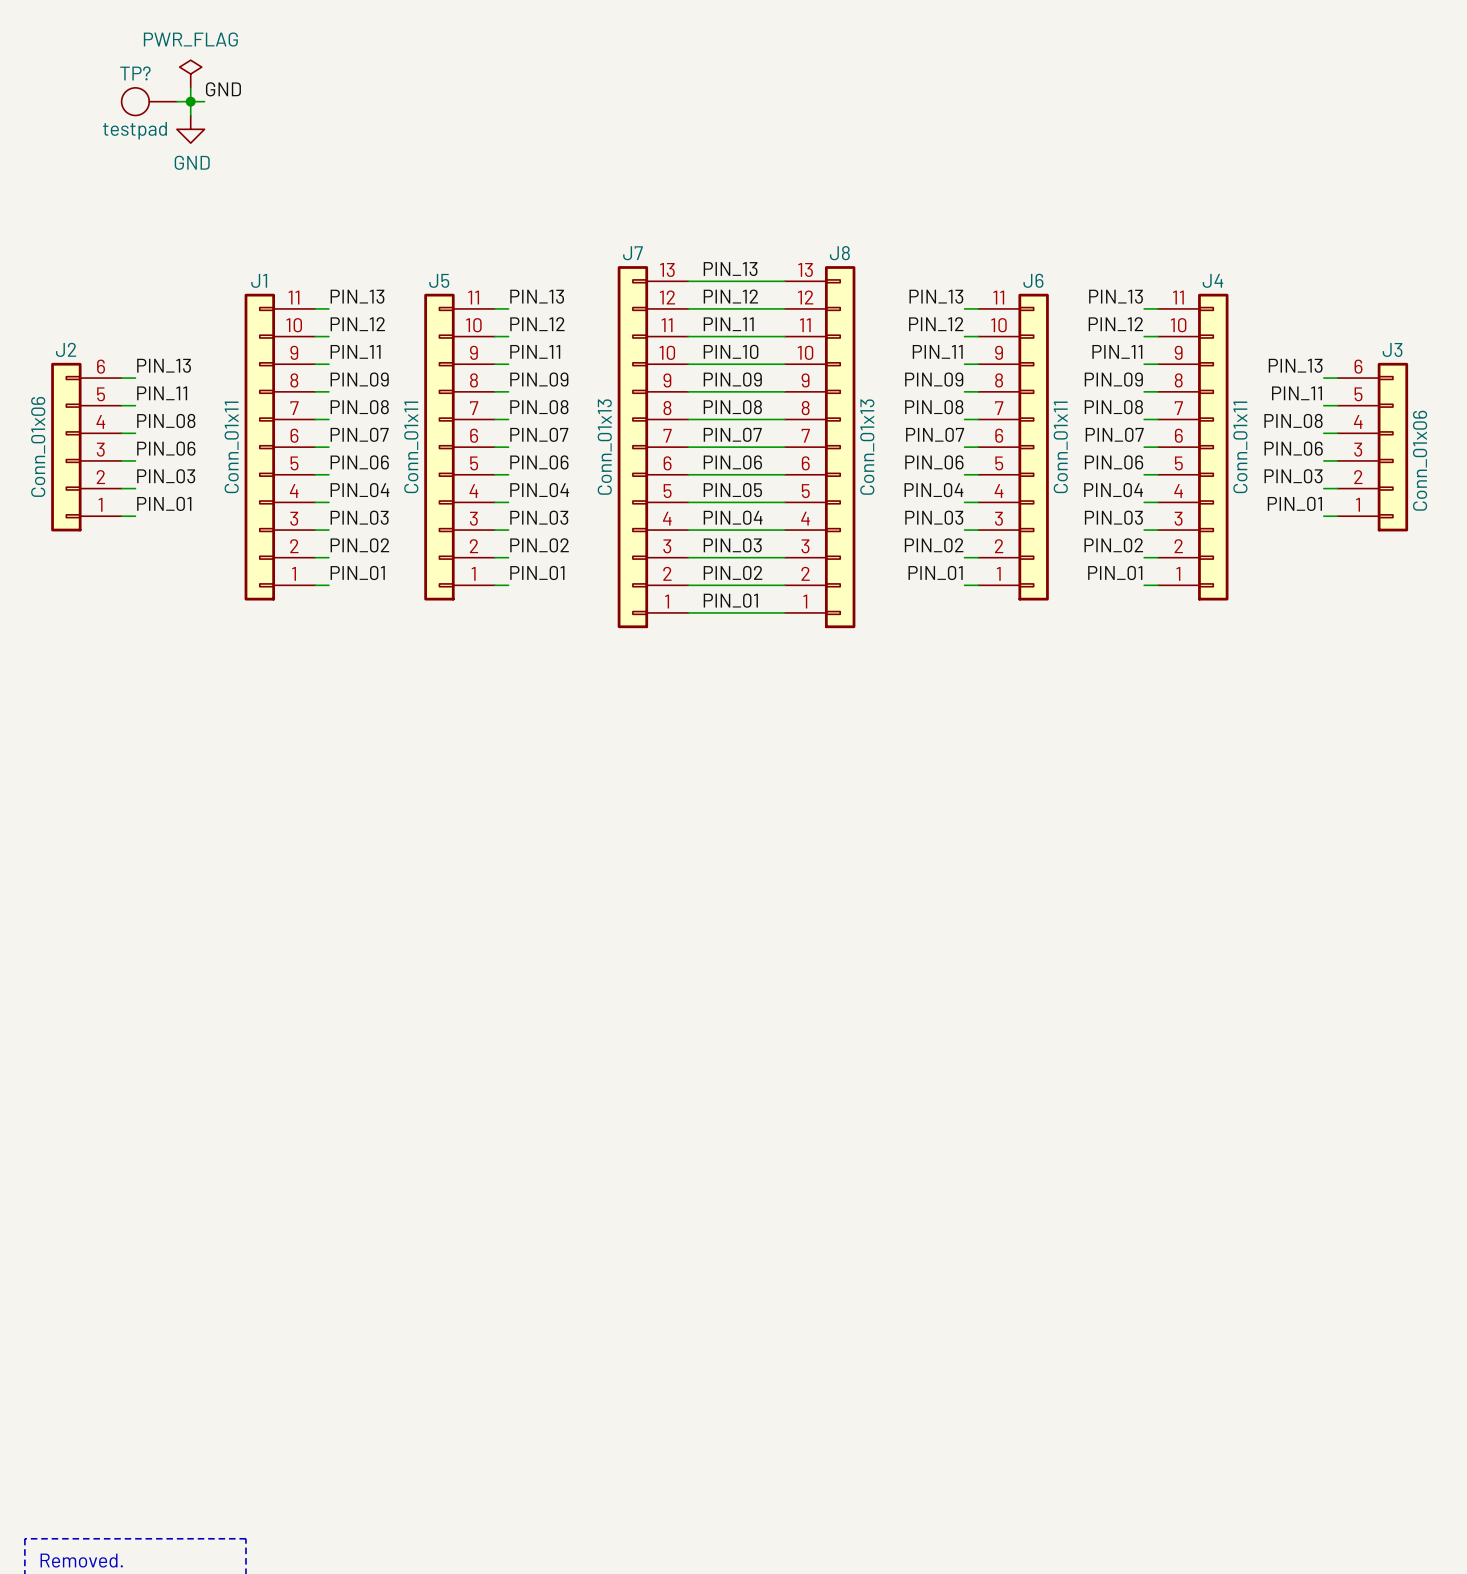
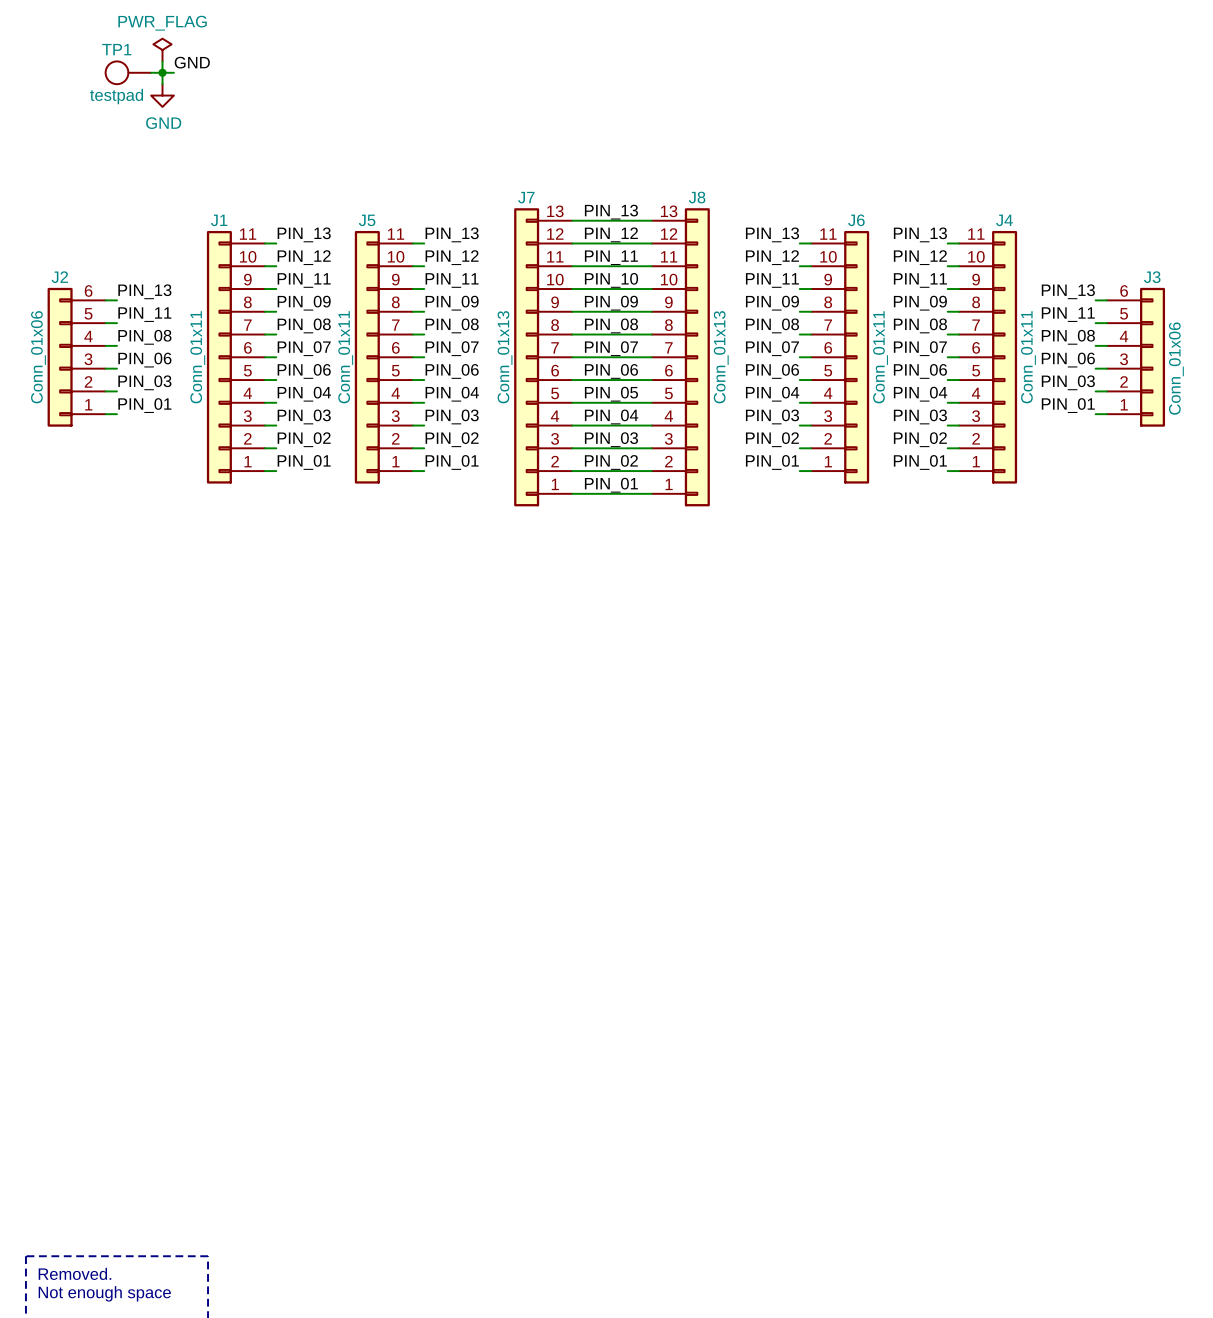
TP? name: TP? (135, 73) -> TP1 (116, 49)

